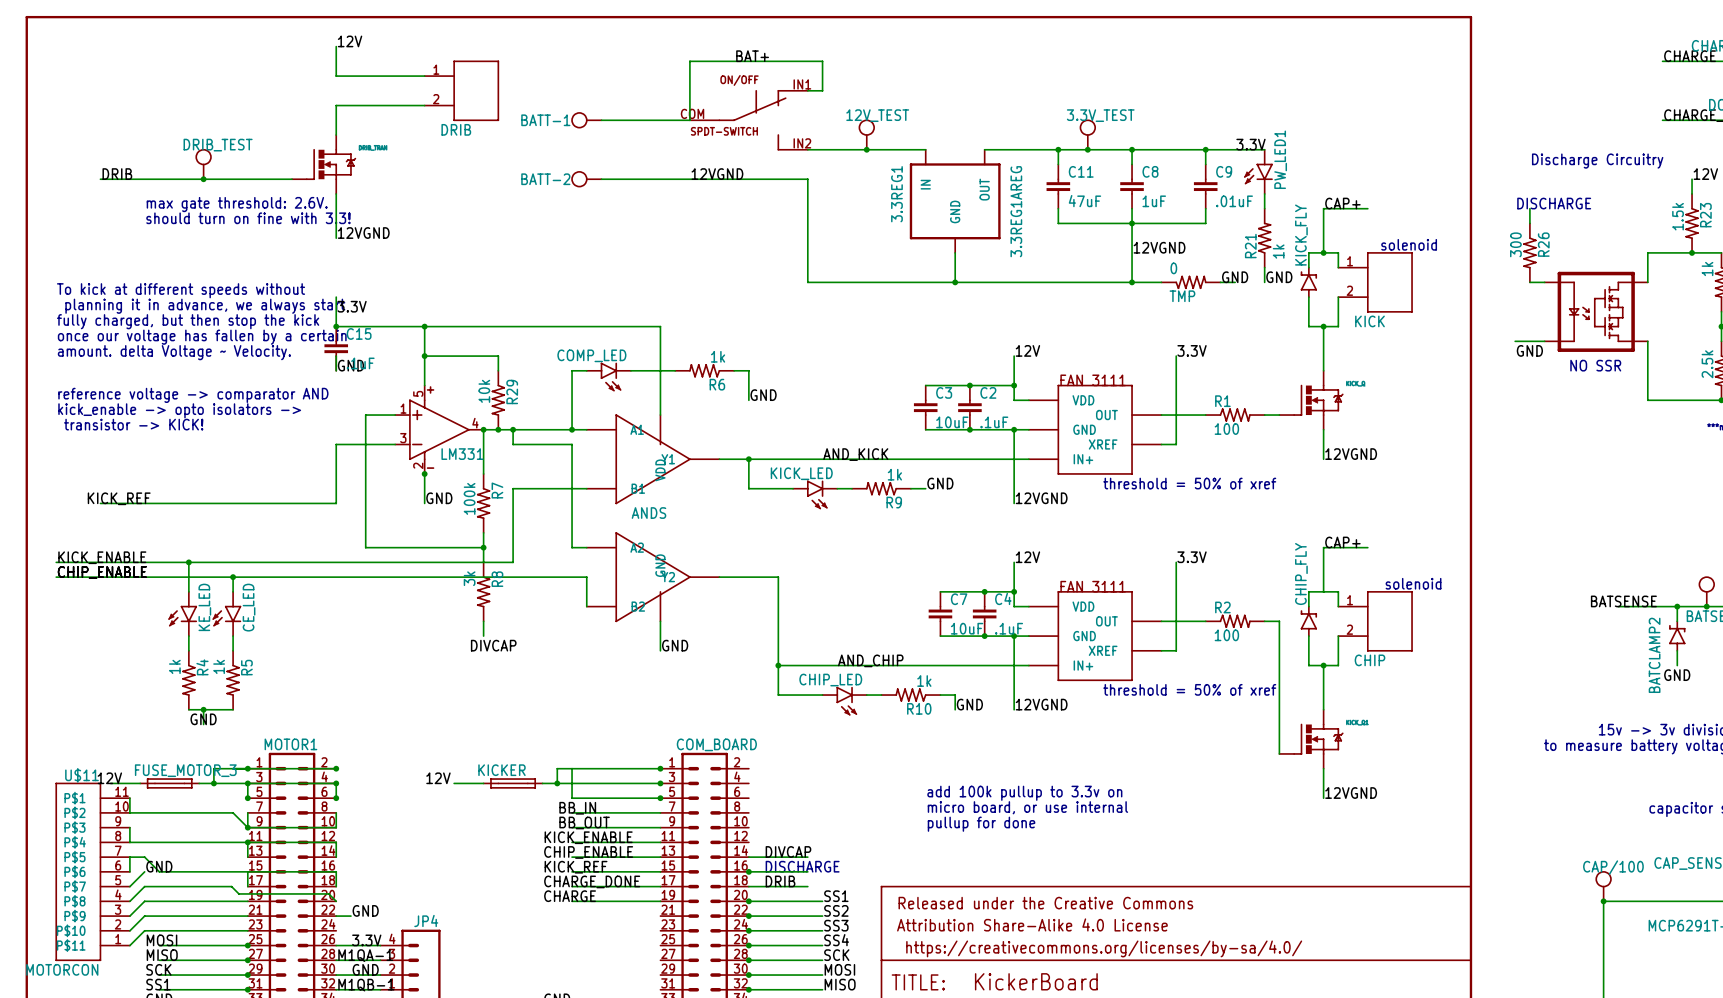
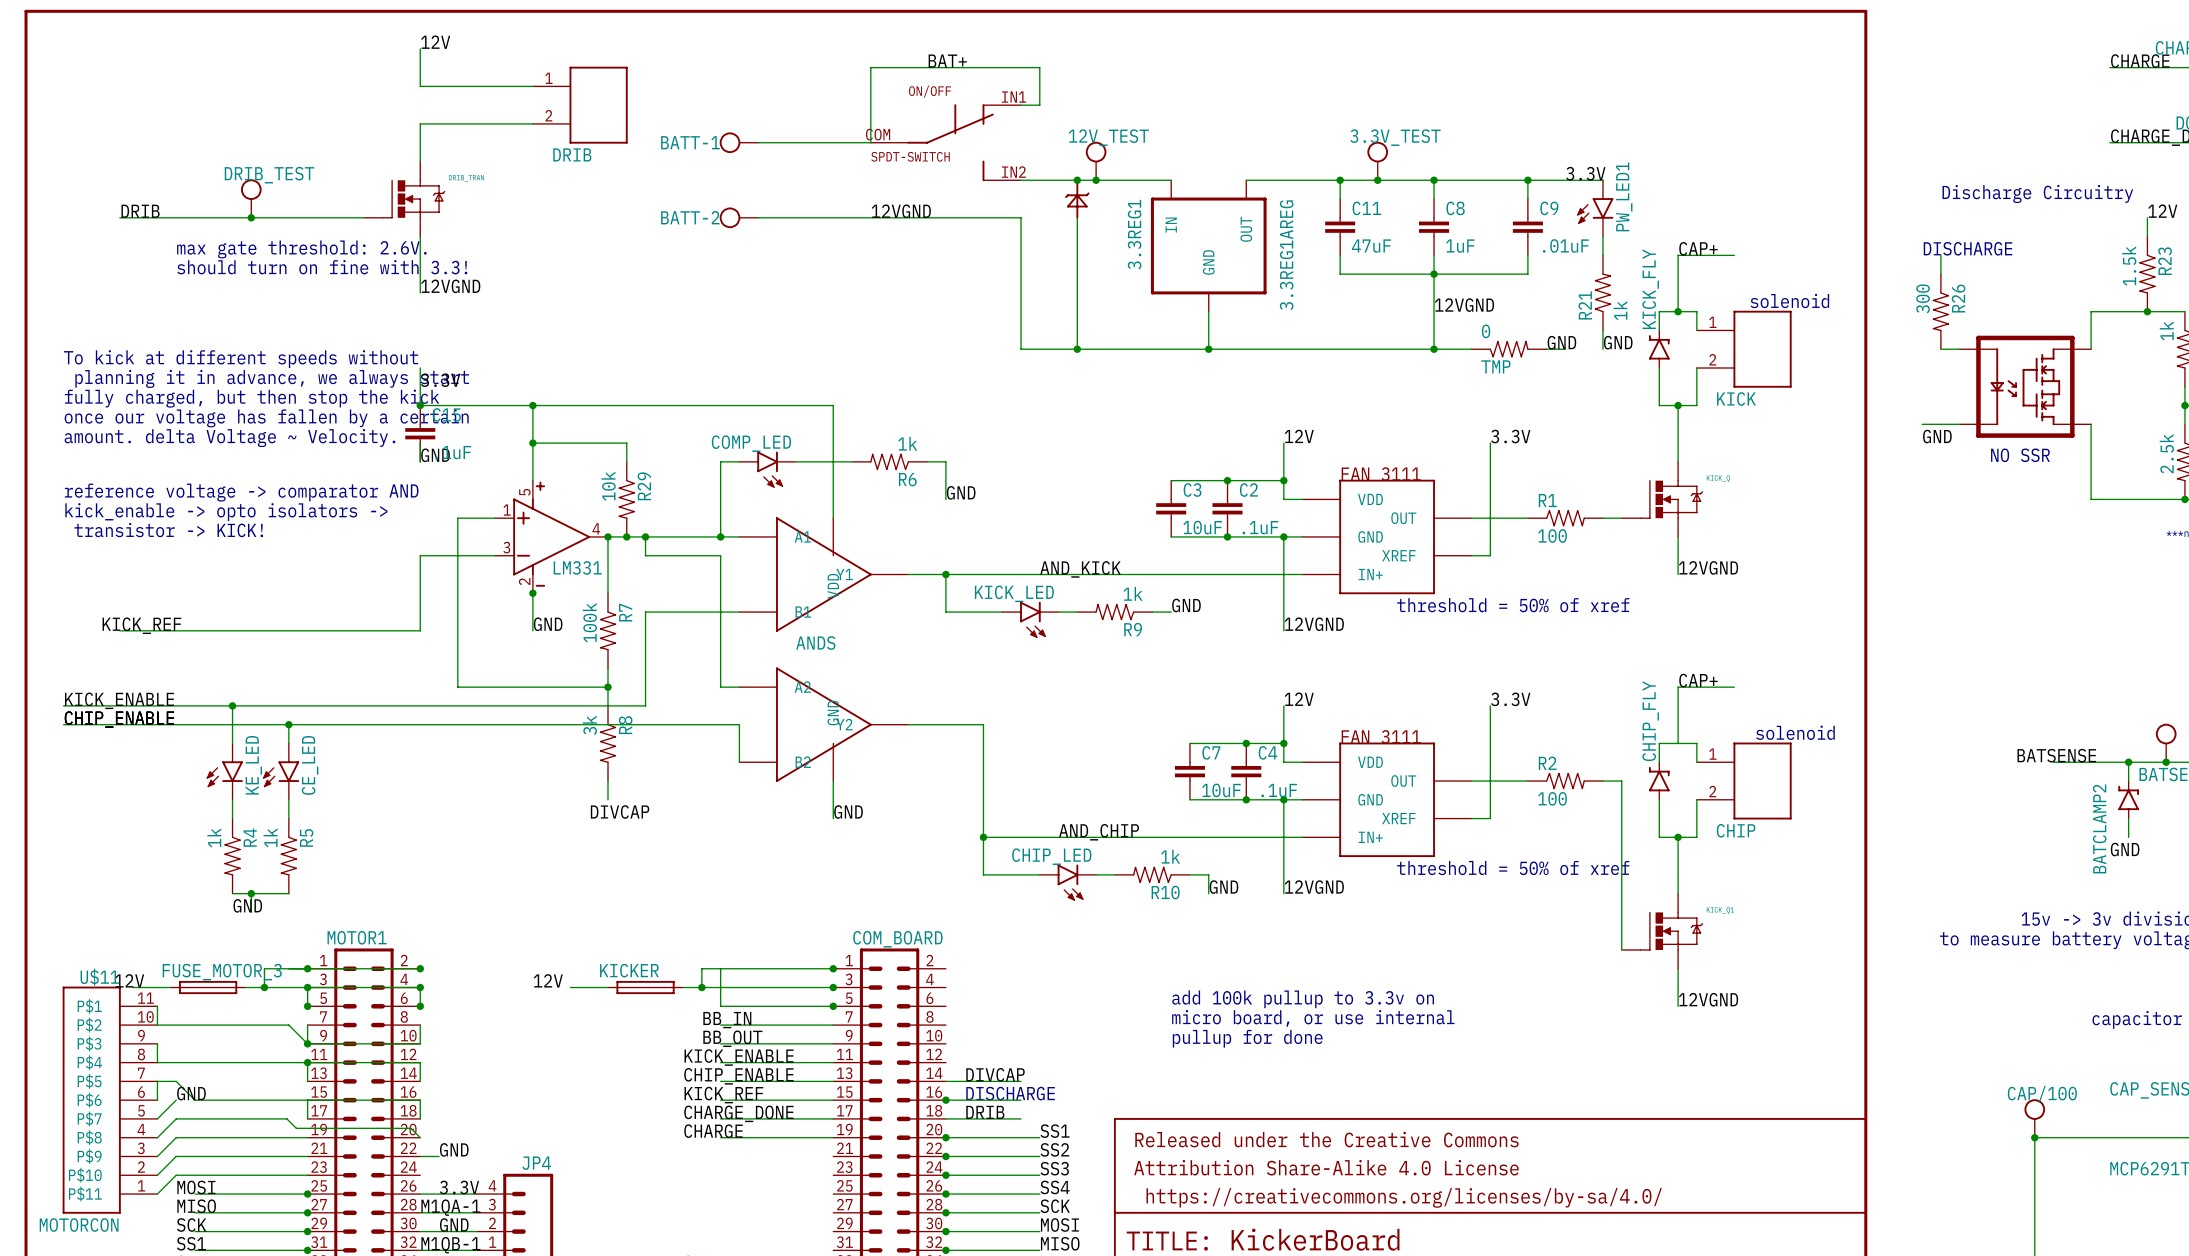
junction: none -> (1077, 180)
part: none -> (1077, 199)
wire: none -> (1077, 217) (1077, 349)
junction: none -> (1077, 349)

